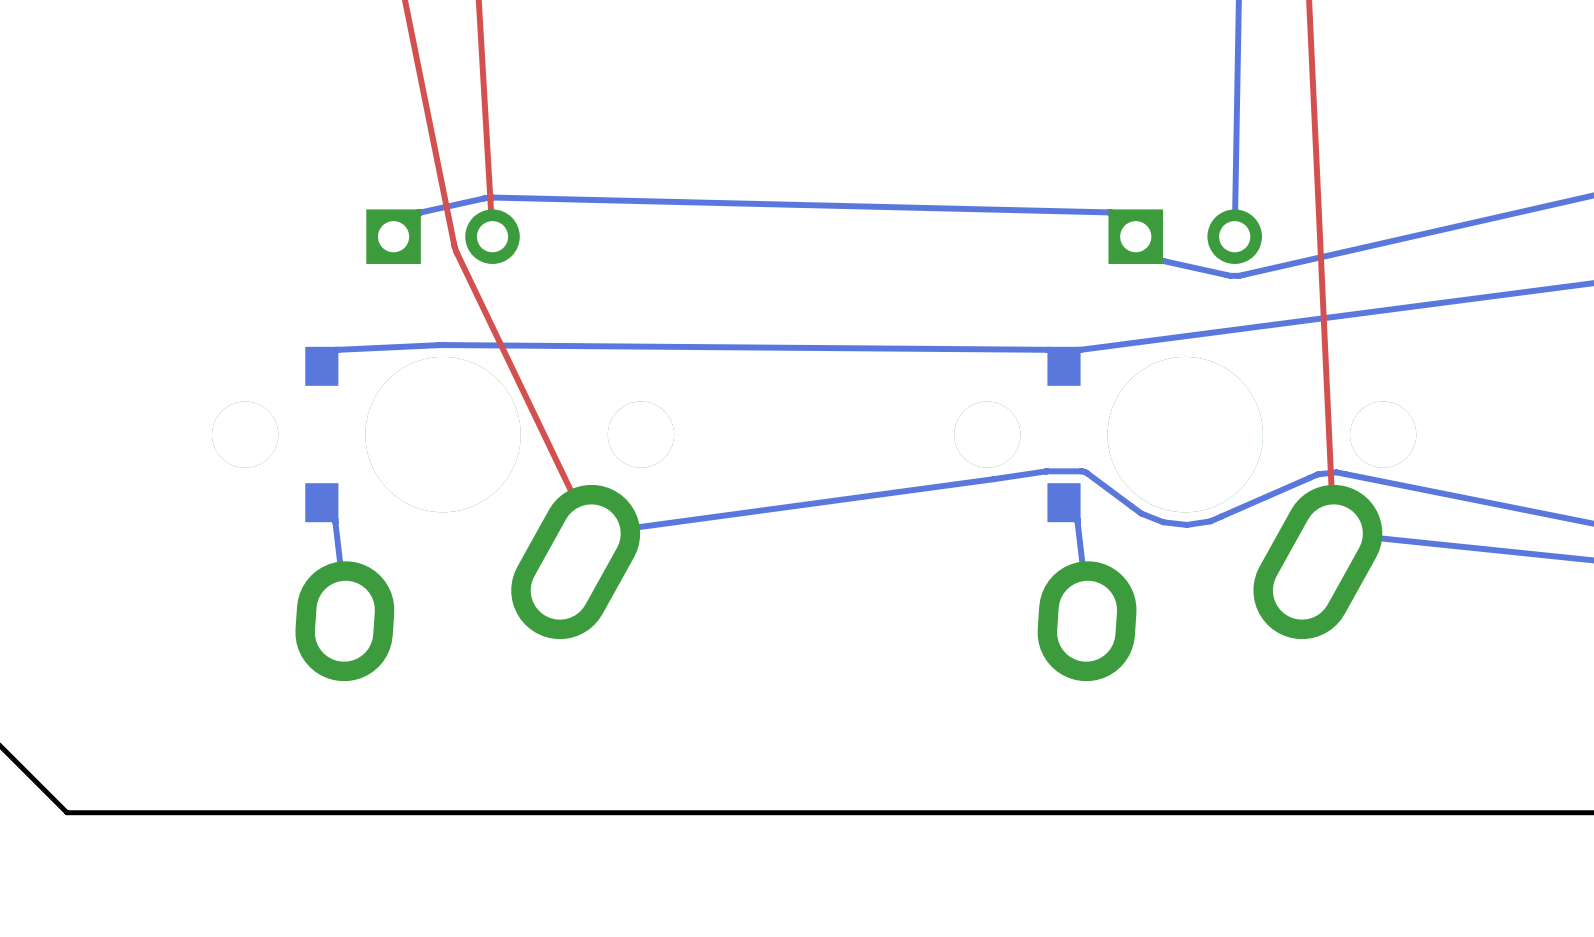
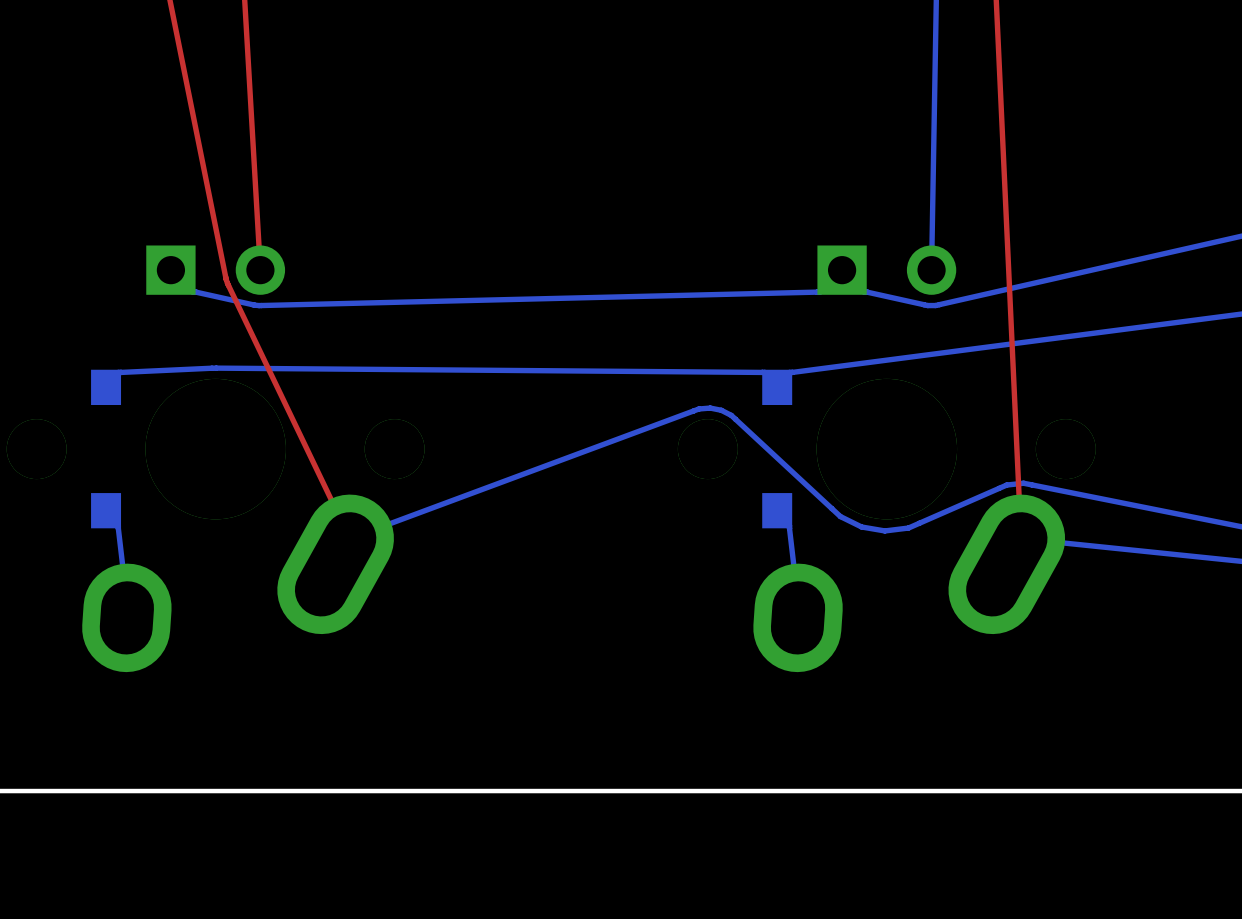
bottom track: (421, 212) (491, 197) (1111, 212) (1135, 236) -> (196, 292) (259, 305) (820, 292) (842, 270)
bottom track: (1045, 471) (993, 479) -> none
bottom track: (1046, 471) (1086, 472) (1141, 513) (1163, 522) (1186, 524) (1210, 521) (1221, 516) -> none
bottom track: (993, 479) (591, 533) -> (919, 523) (908, 528) (884, 530) (861, 526) (840, 516) (731, 415) (721, 410) (710, 408) (698, 408) (349, 538)

